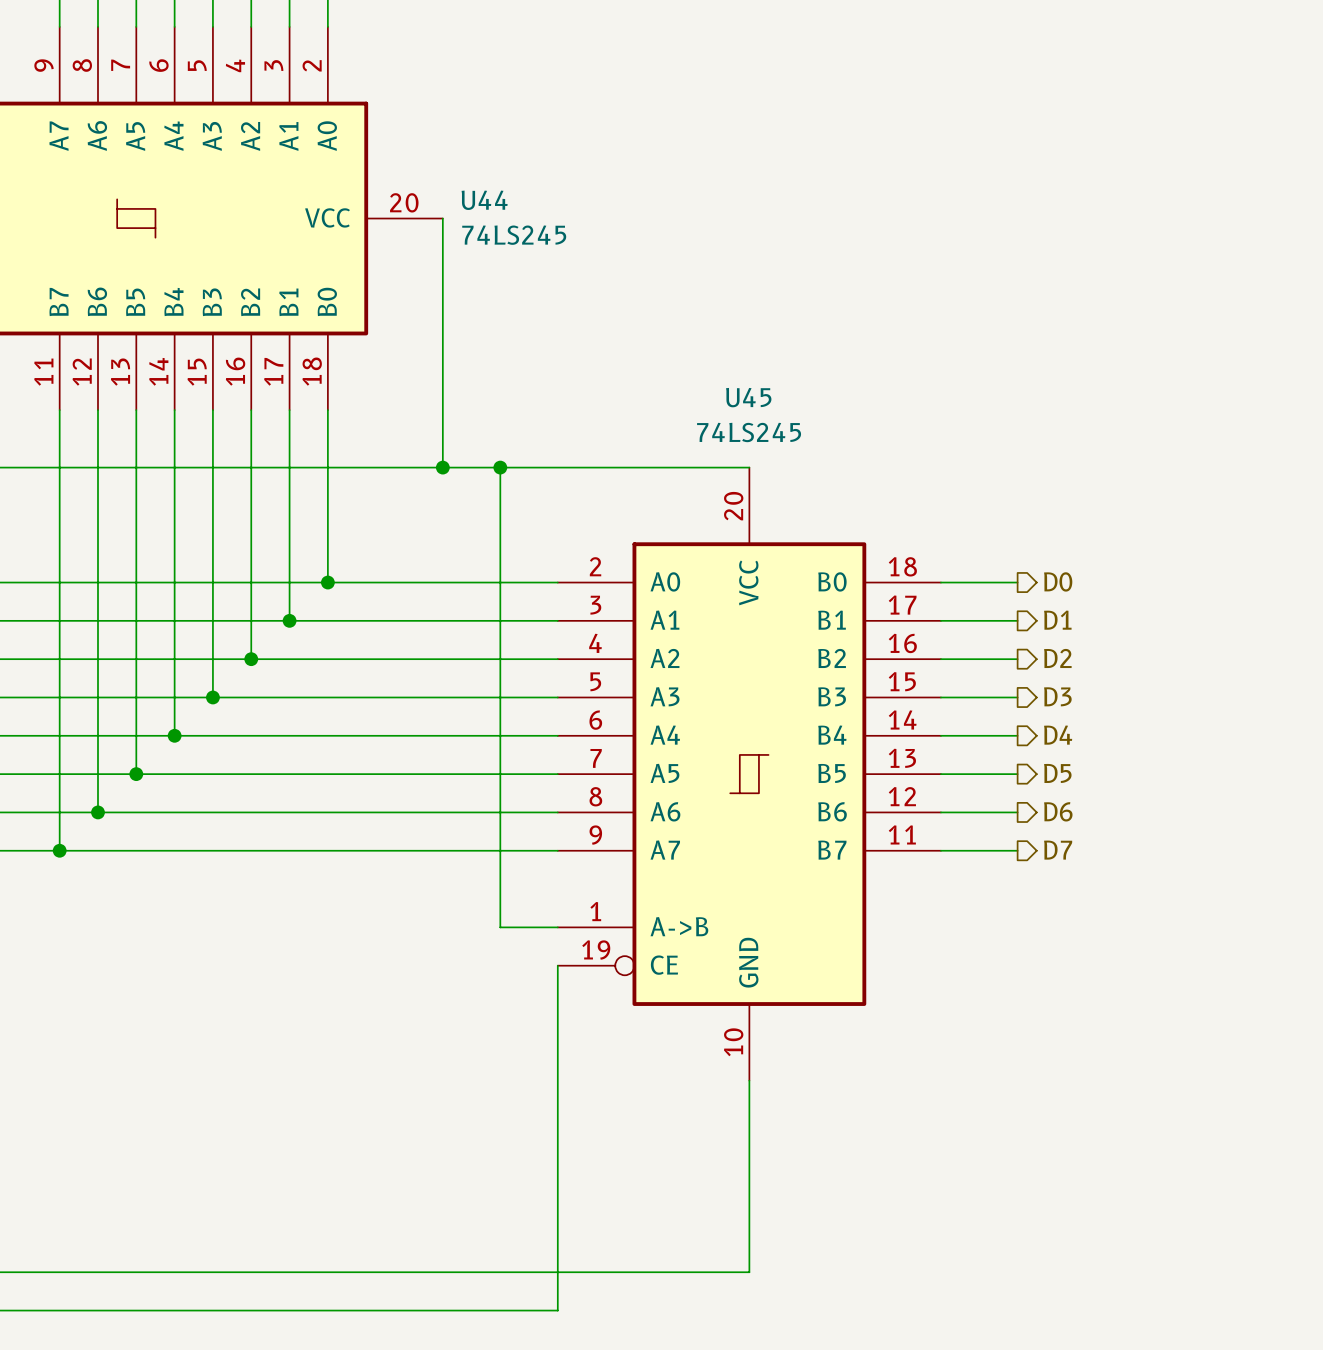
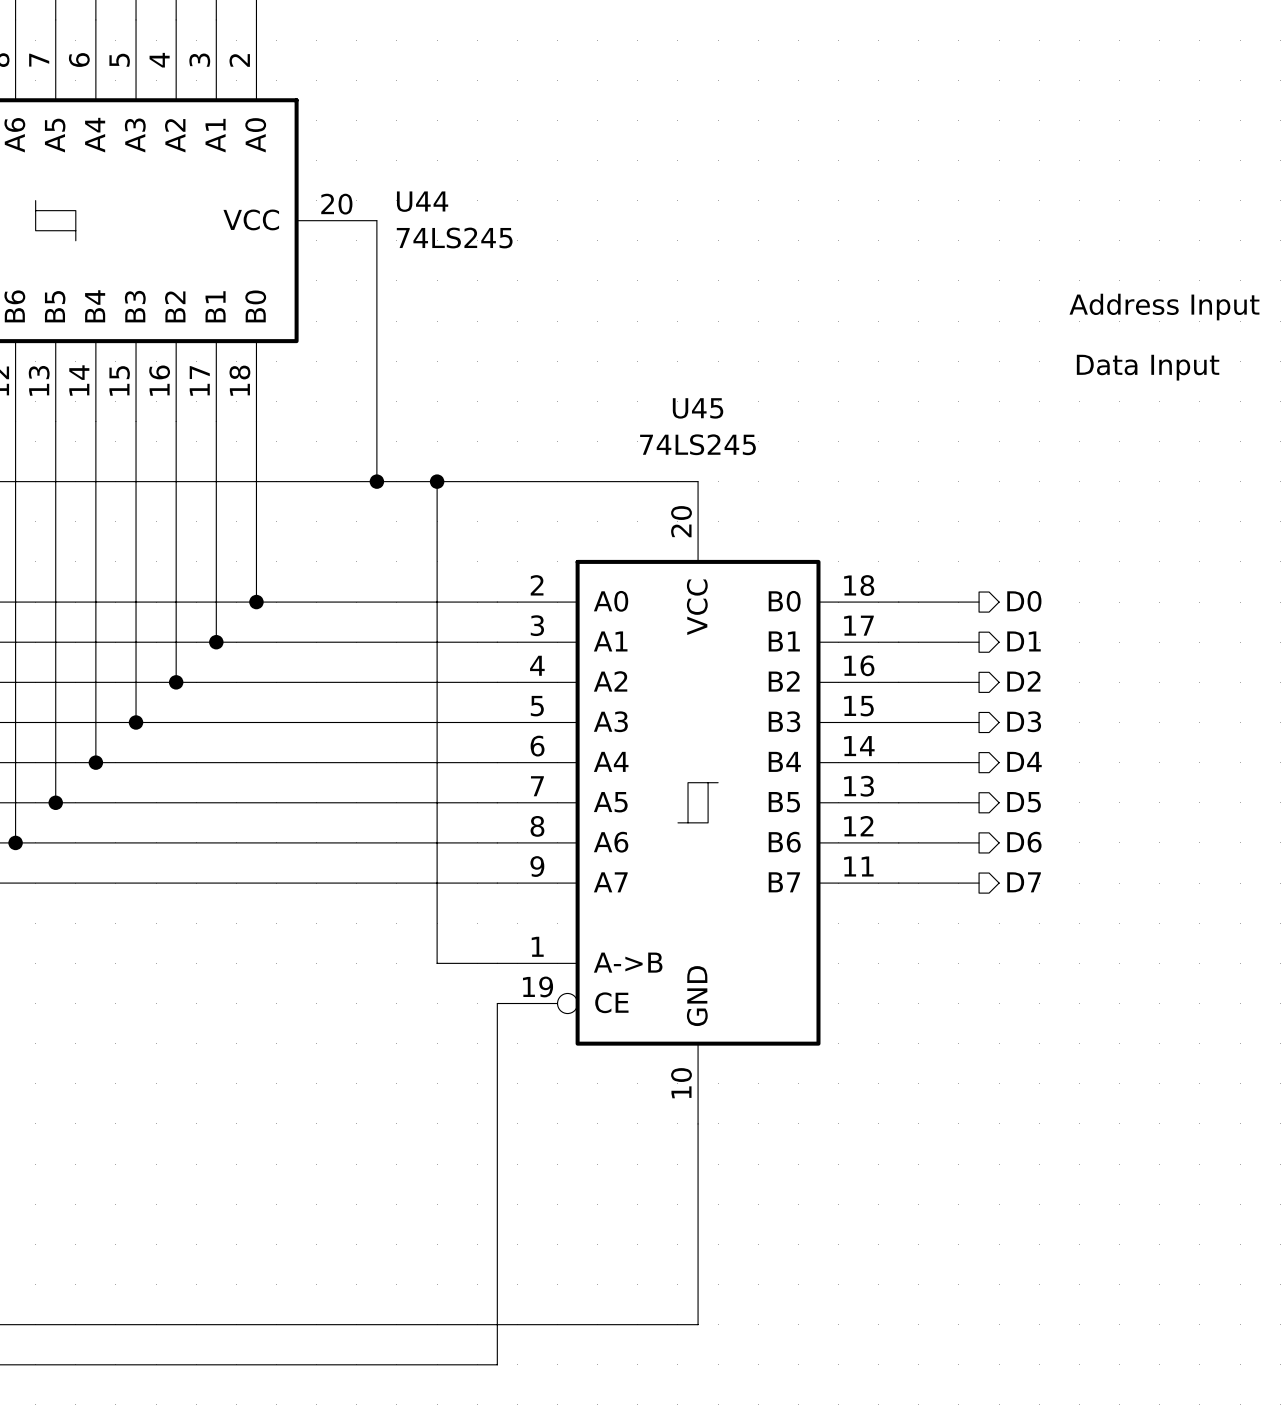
text: none -> Address Input (1164, 307)
text: none -> Data Input (1148, 367)

